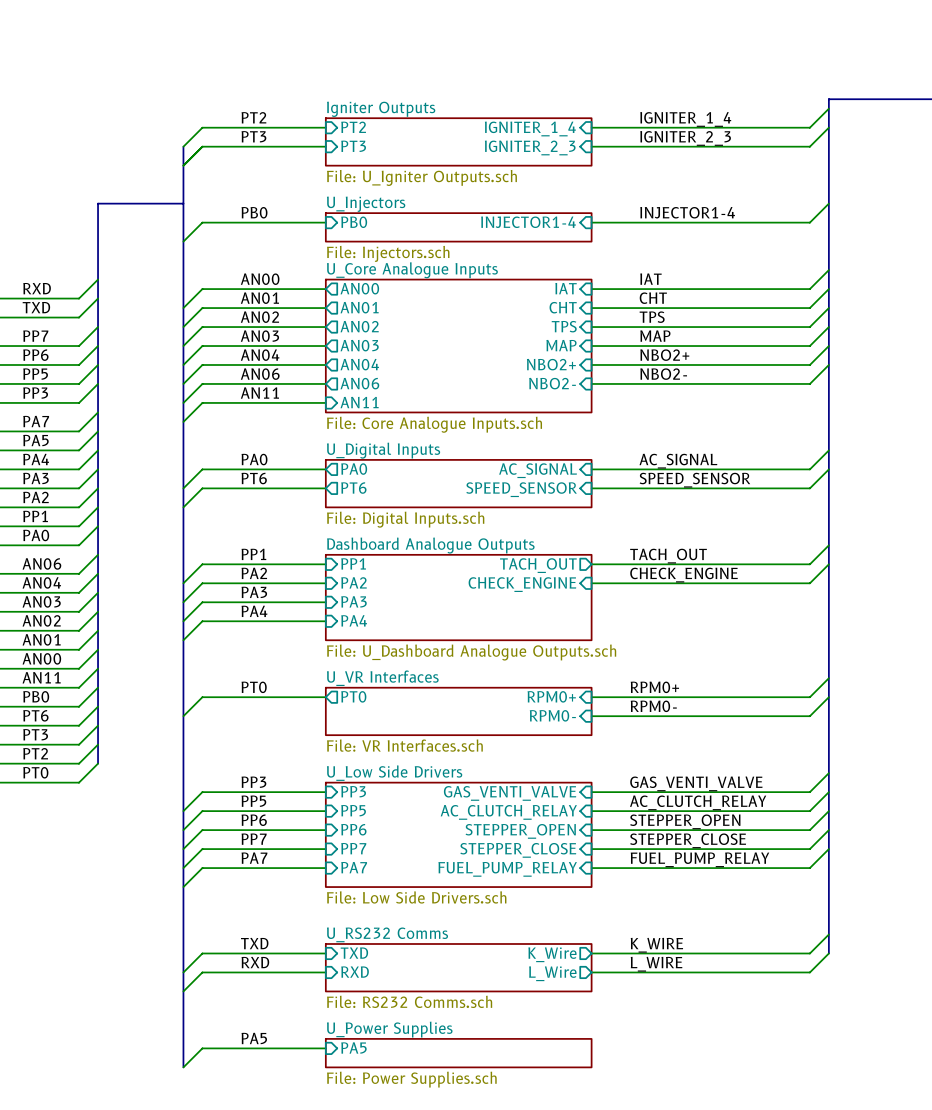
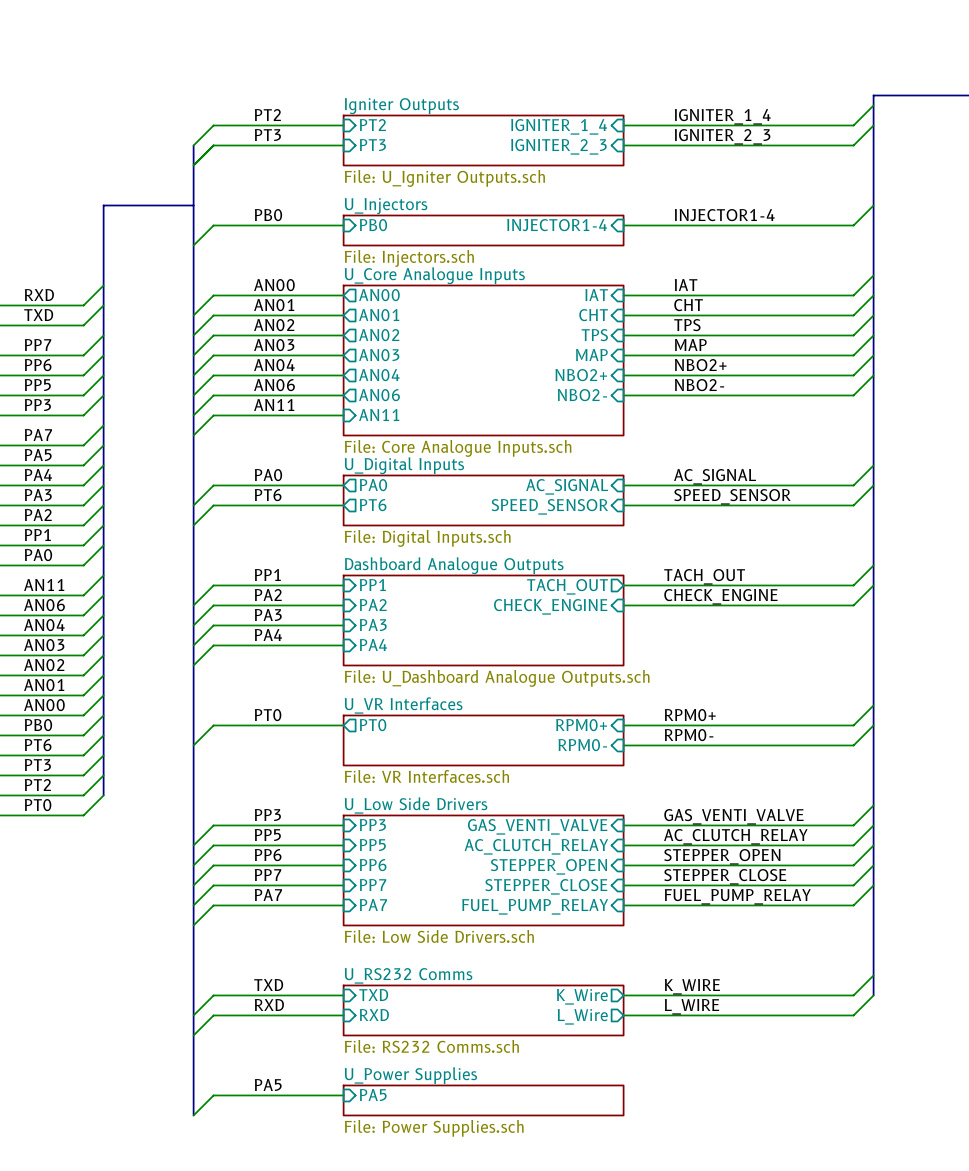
sheet U_Core Analogue Inputs shape: [325, 279, 592, 413] -> [343, 285, 624, 436]
label: AN06 (41, 563) -> AN11 (44, 585)
label: AN04 (41, 582) -> AN06 (44, 605)
label: AN03 (41, 601) -> AN04 (44, 625)
label: AN02 (41, 620) -> AN03 (44, 645)
label: AN01 (41, 639) -> AN02 (44, 665)
label: AN00 (41, 658) -> AN01 (44, 685)
label: AN11 (41, 677) -> AN00 (44, 705)

